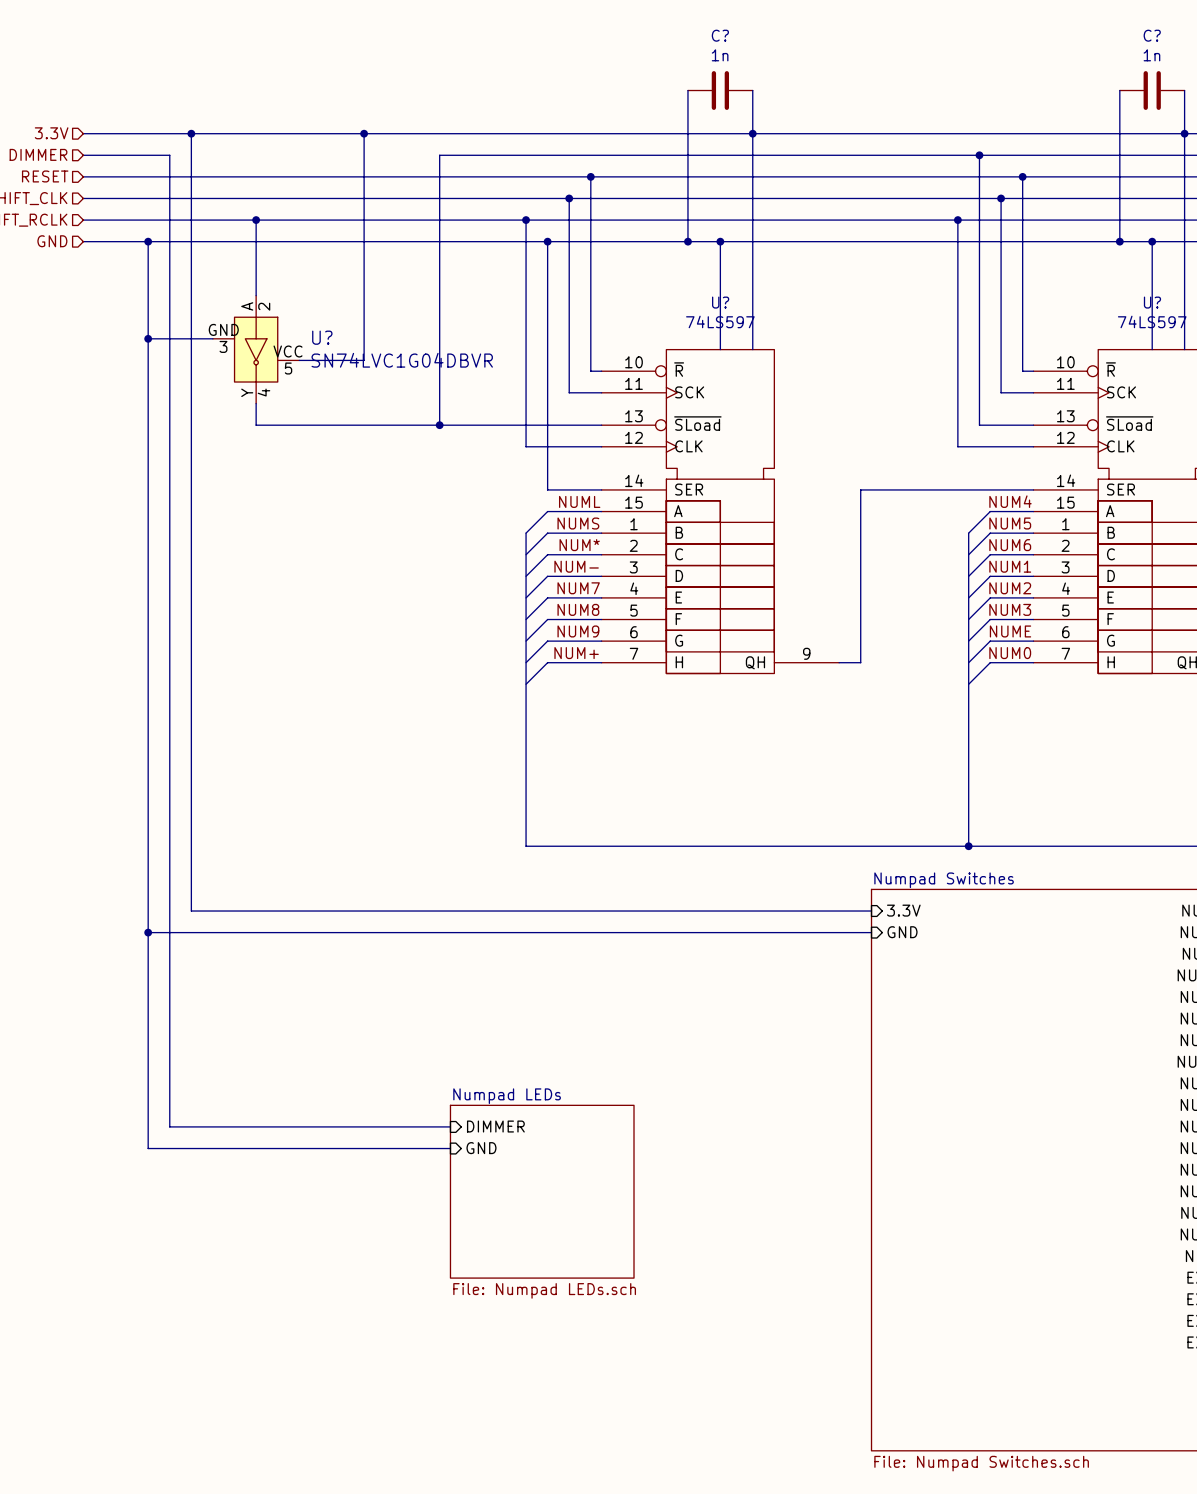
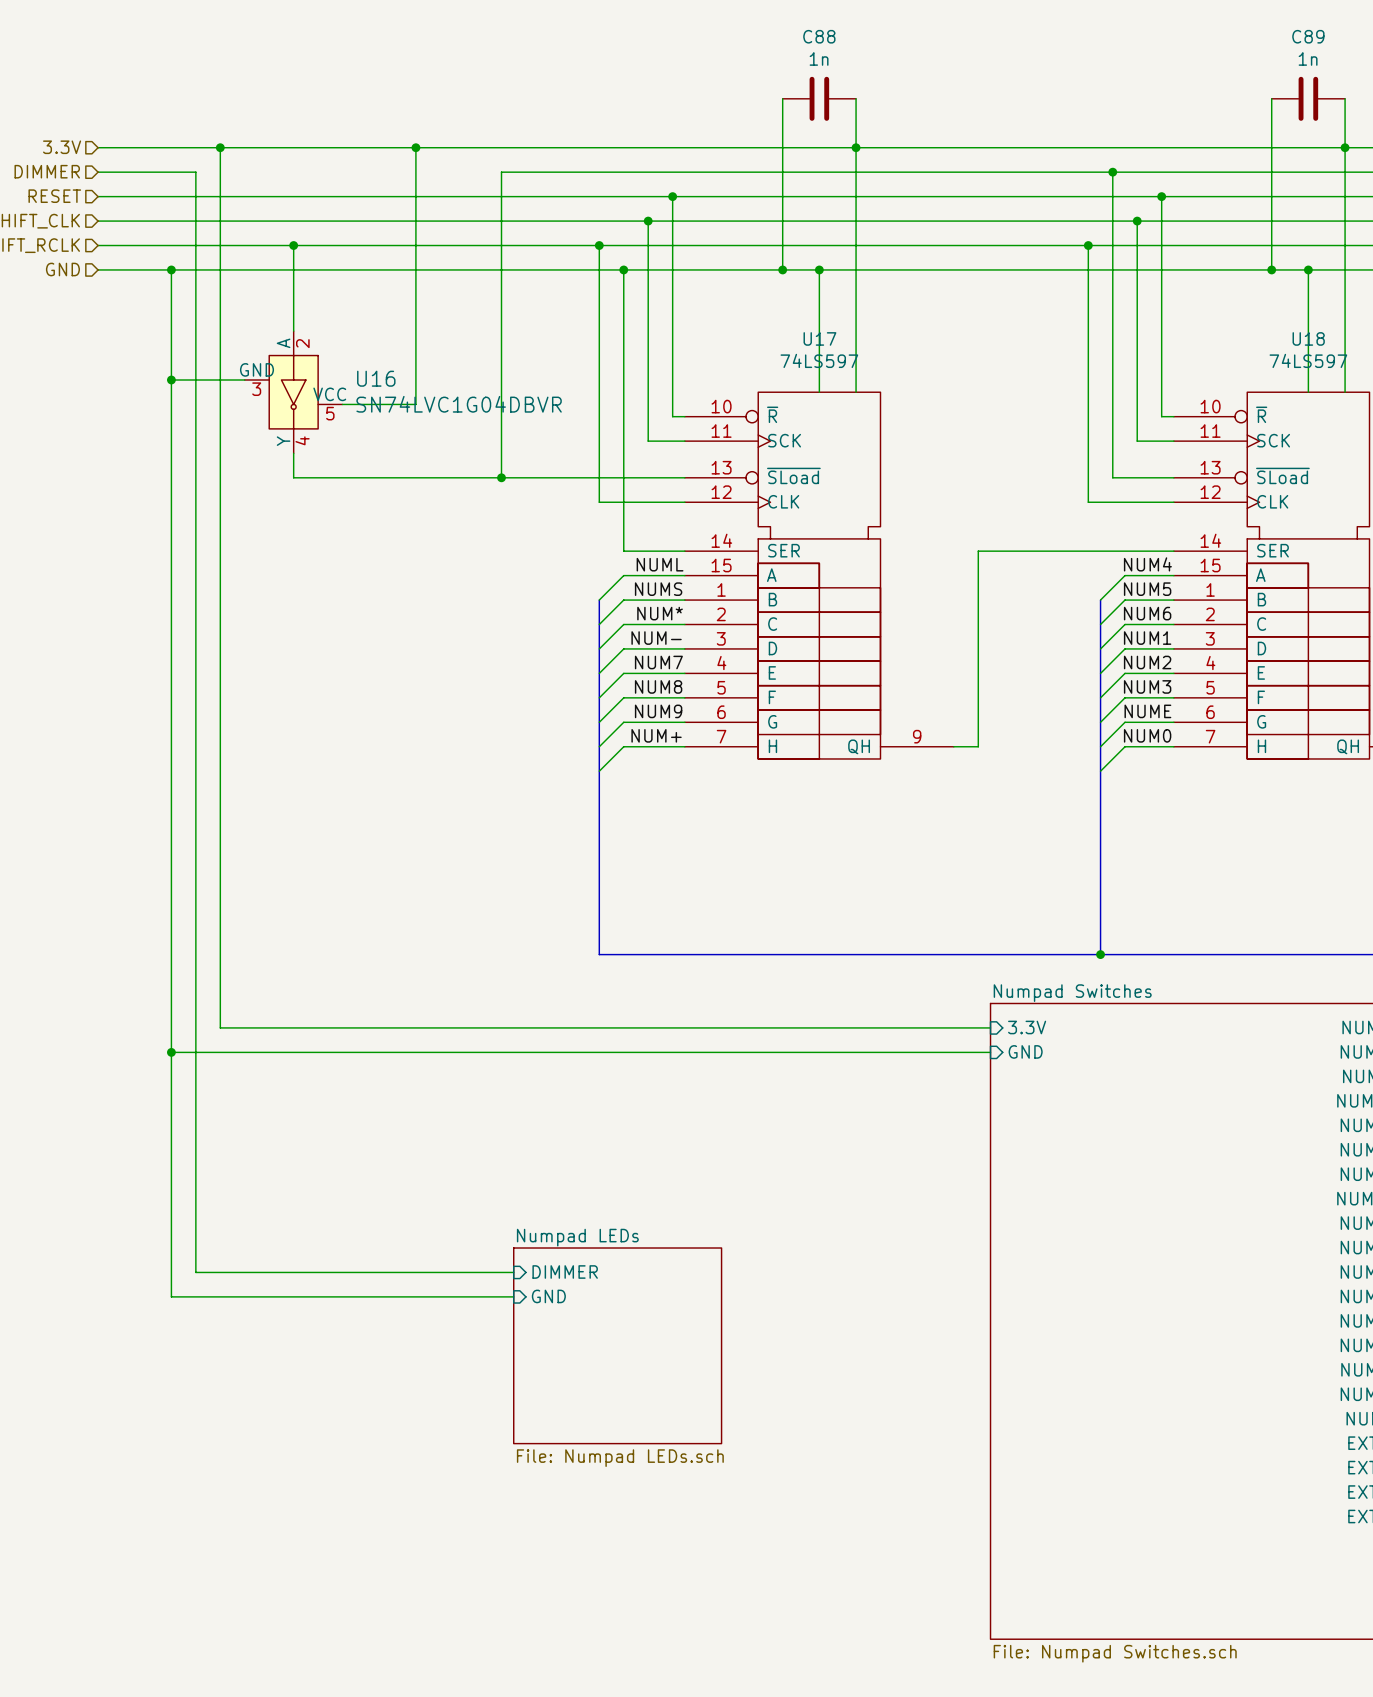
C? name: C? (720, 35) -> C88 (819, 36)
C? name: C? (1152, 35) -> C89 (1308, 36)
U? name: U? (720, 302) -> U17 (819, 338)
U? name: U? (1152, 302) -> U18 (1308, 338)
U? name: U? (322, 337) -> U16 (376, 378)

